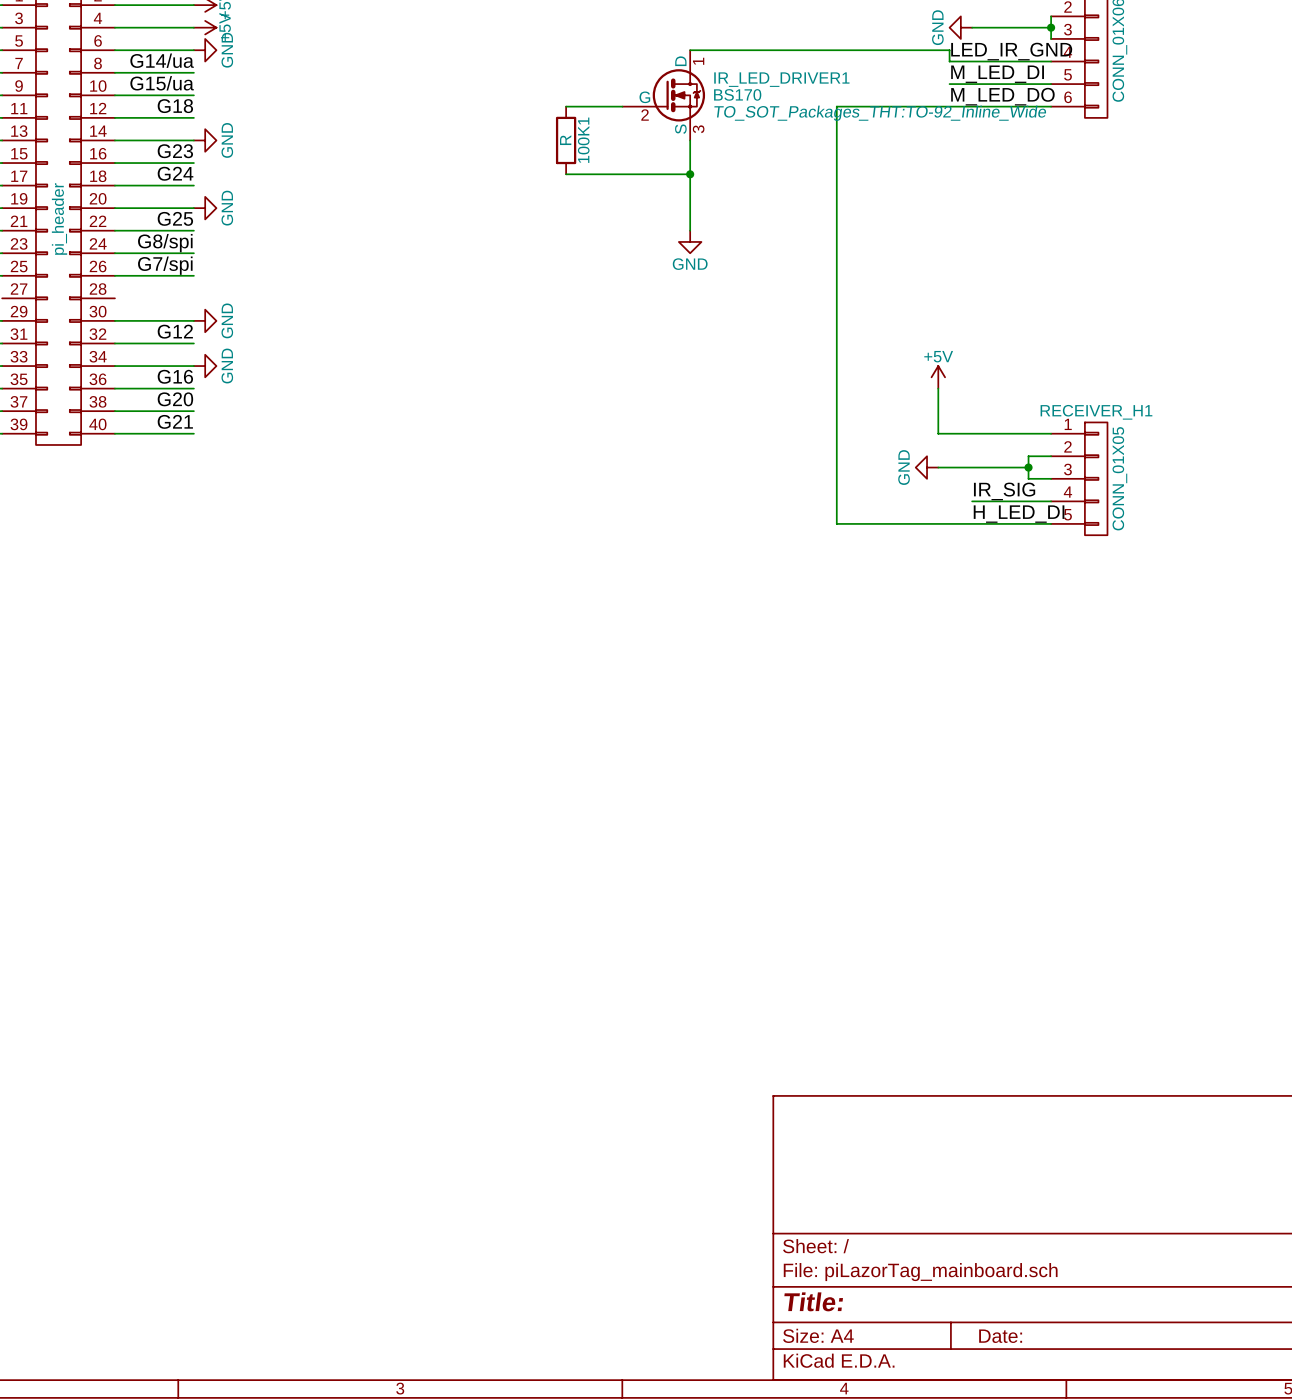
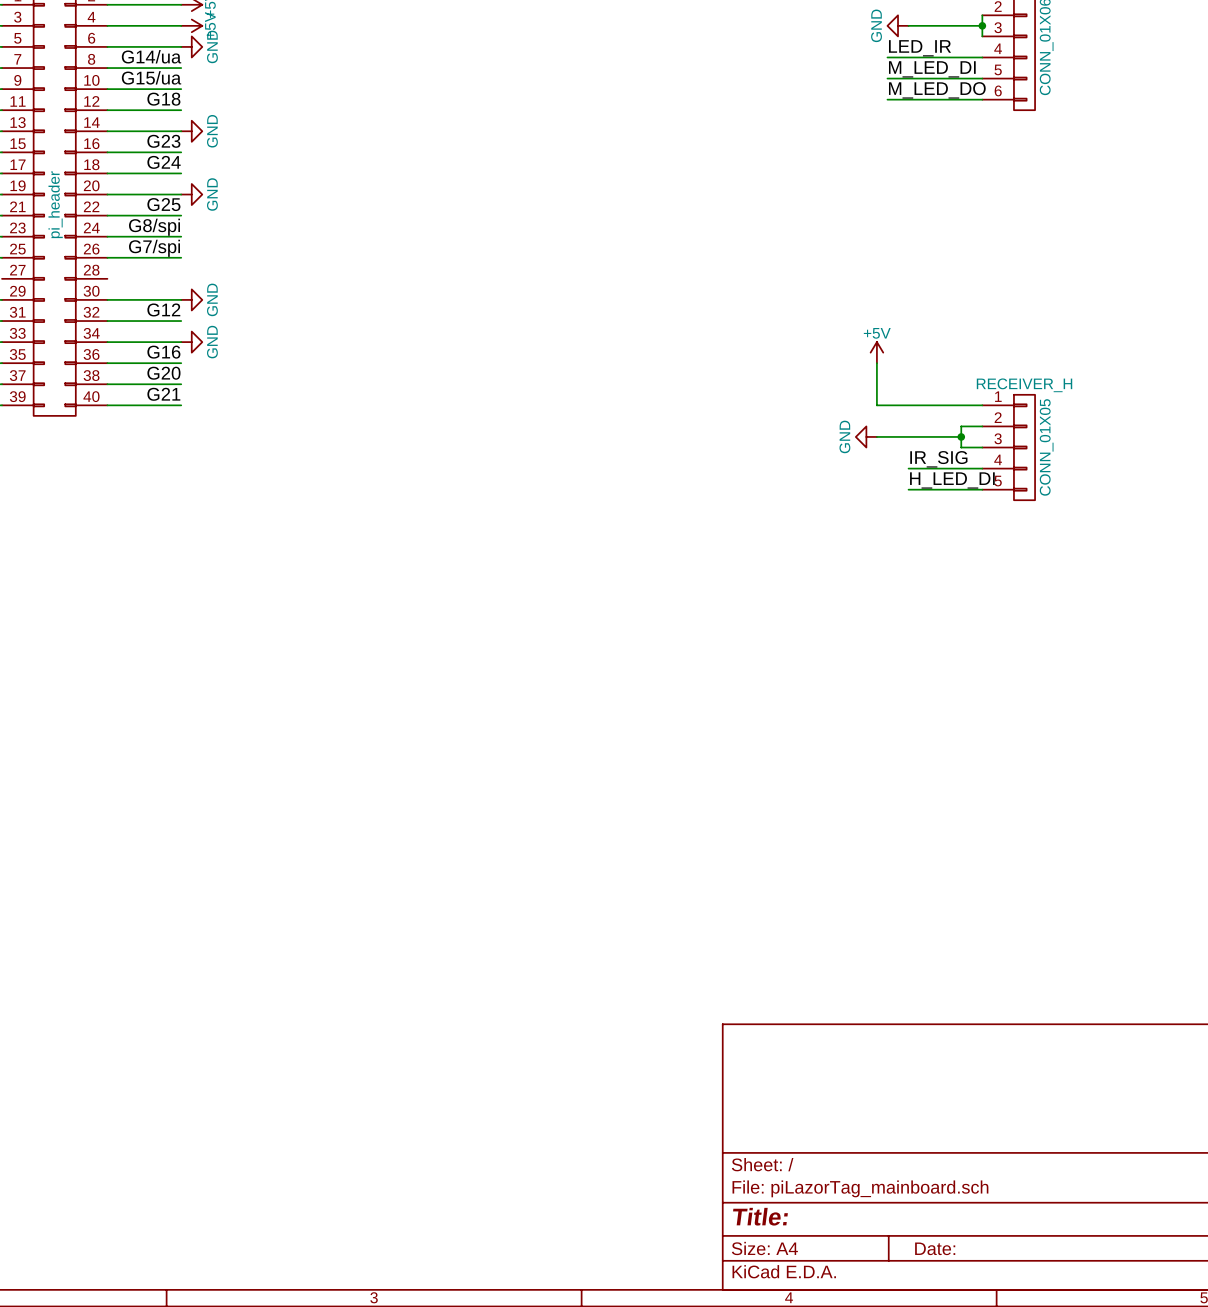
wire: (690, 50) (949, 50) (949, 61) -> none
label: LED_IR_GND (1011, 51) -> LED_IR (919, 48)
IR_LED_DRIVER1: BS170 (663, 95) -> none
wire: (566, 106) (622, 106) -> none
wire: (949, 106) (836, 106) (836, 523) (972, 523) -> none
100K1: R (566, 140) -> none
wire: (690, 140) (690, 230) -> none
wire: (566, 174) (690, 174) -> none
junction: (690, 174) -> none
power symbol: GND (690, 241) -> none
RECEIVER_H1 name: RECEIVER_H1 (1096, 412) -> RECEIVER_H (1024, 385)

